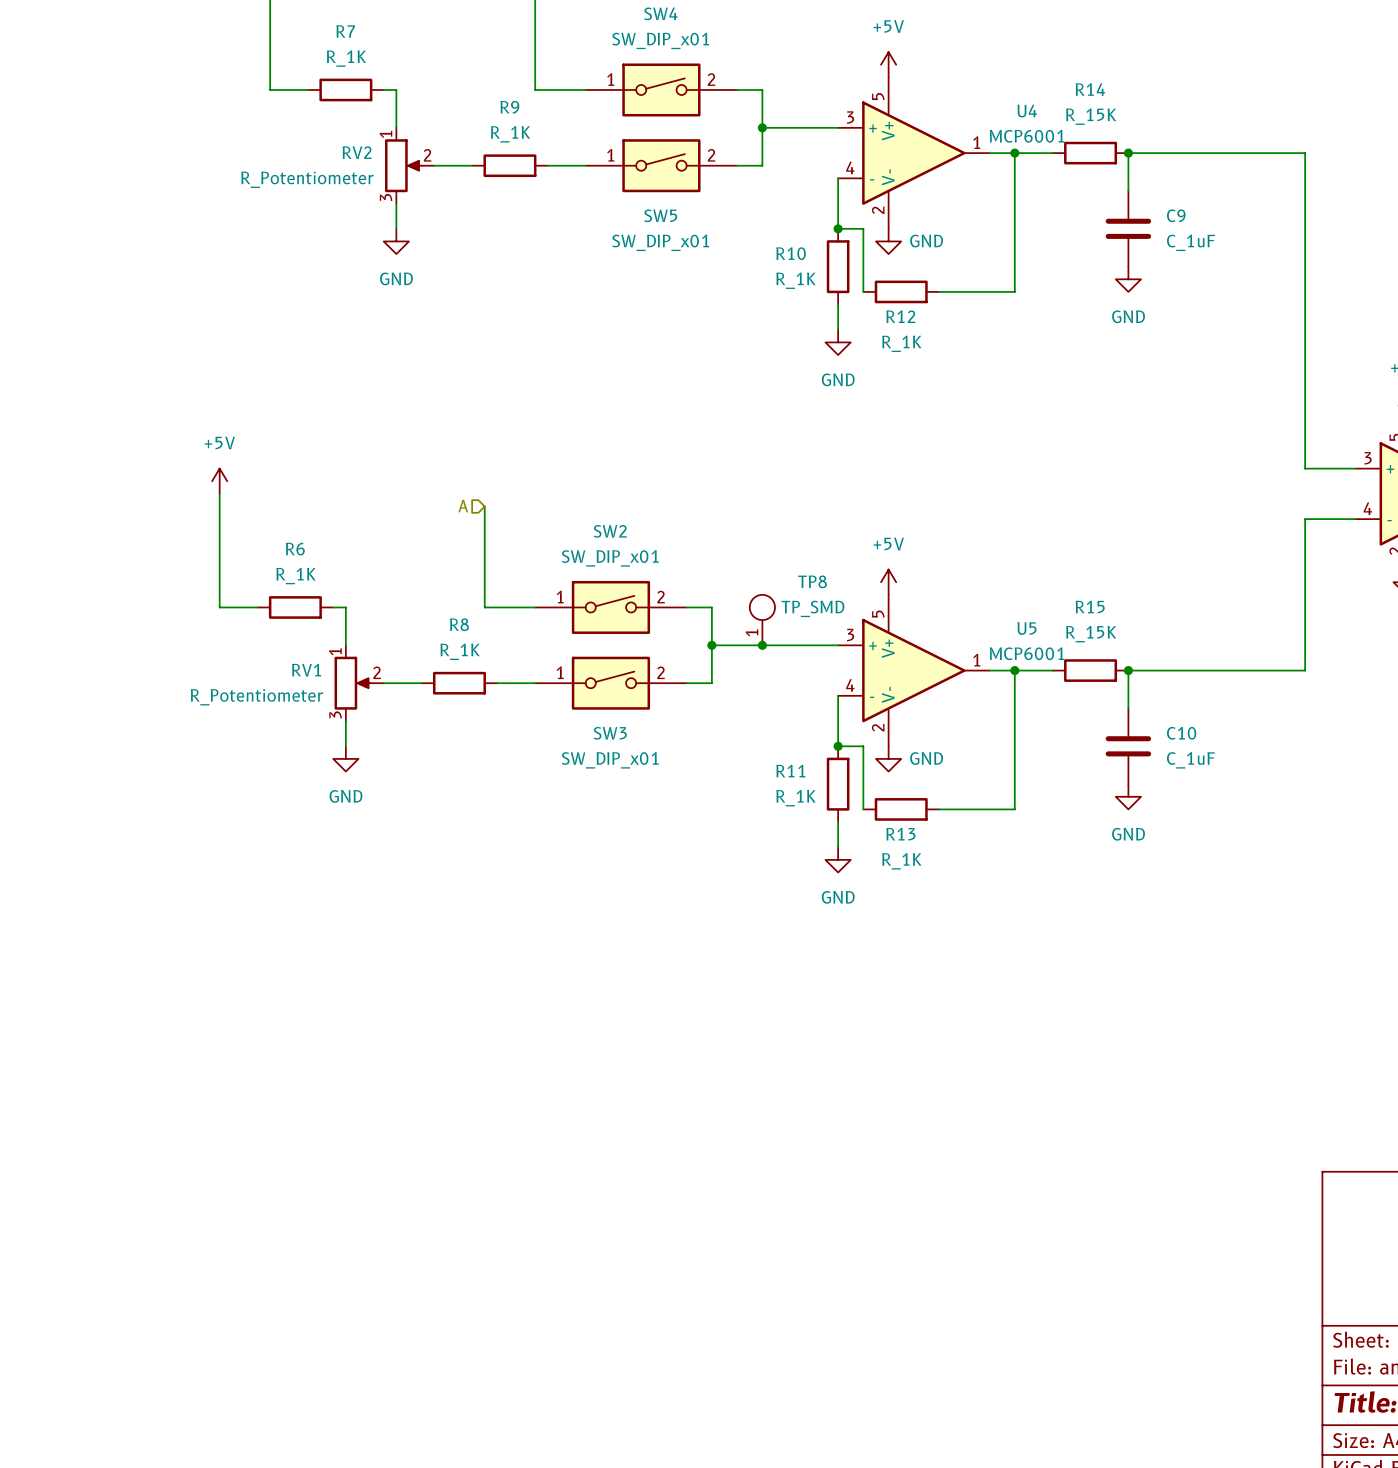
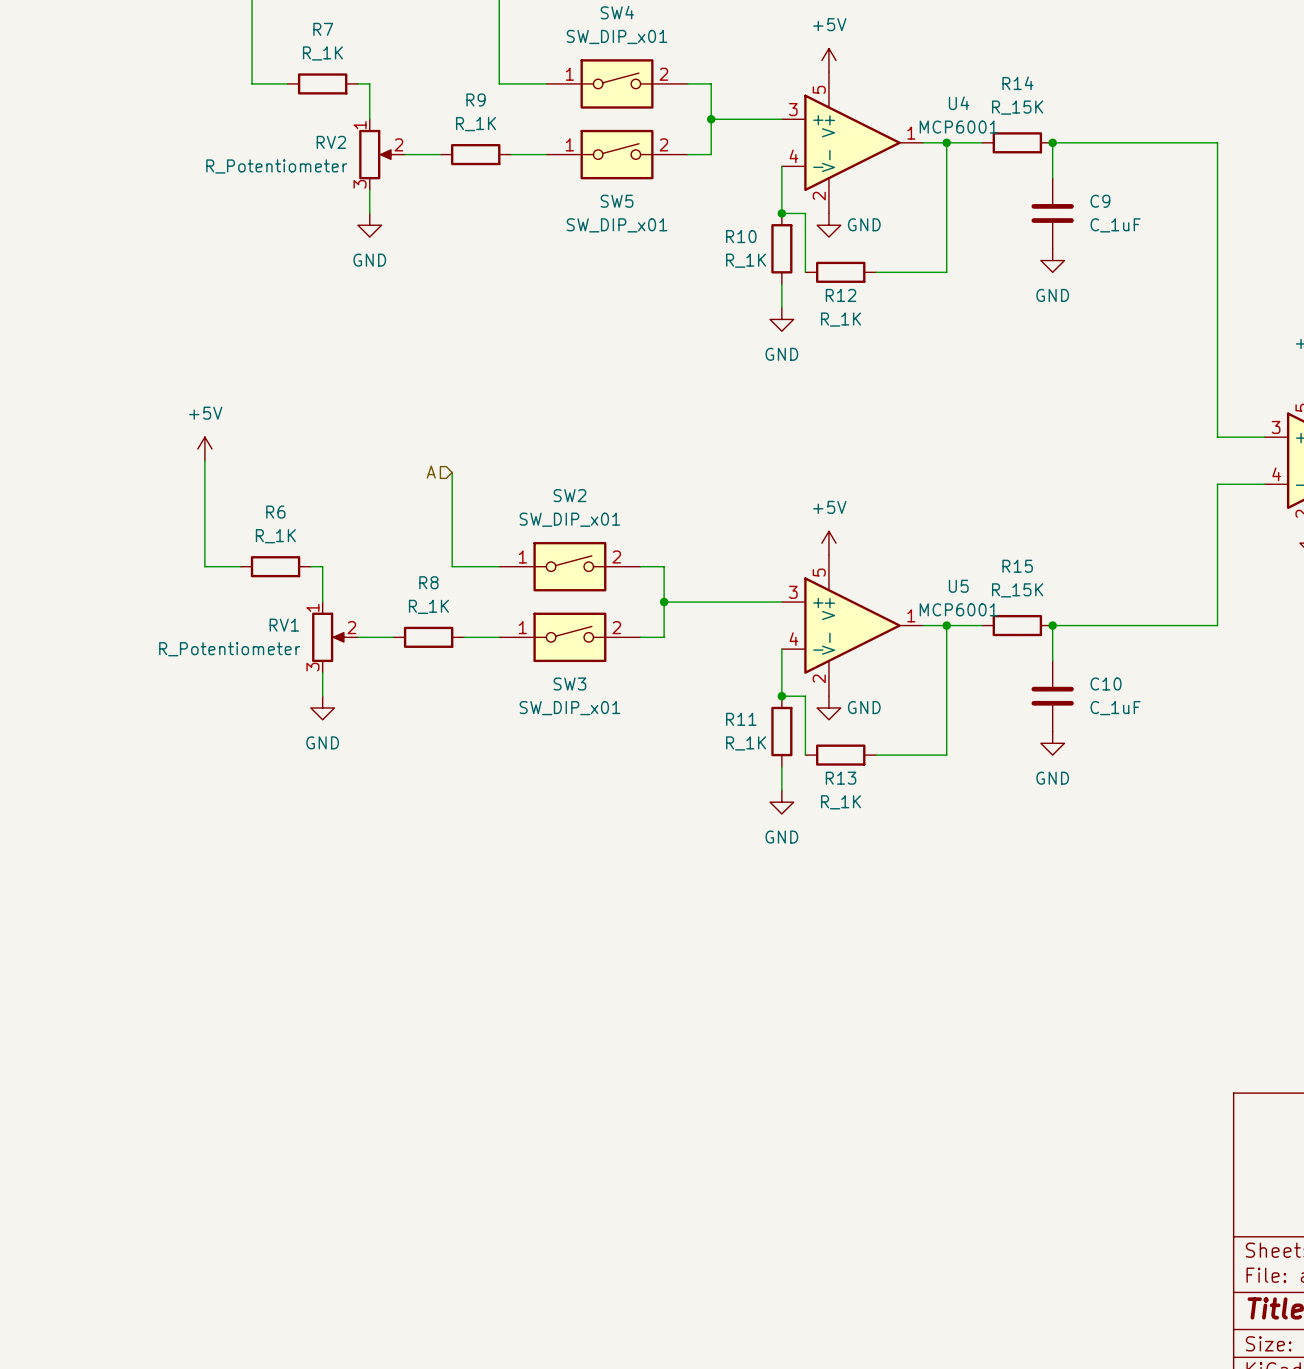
TP8: TP_SMD (762, 620) -> none
junction: (762, 645) -> none

